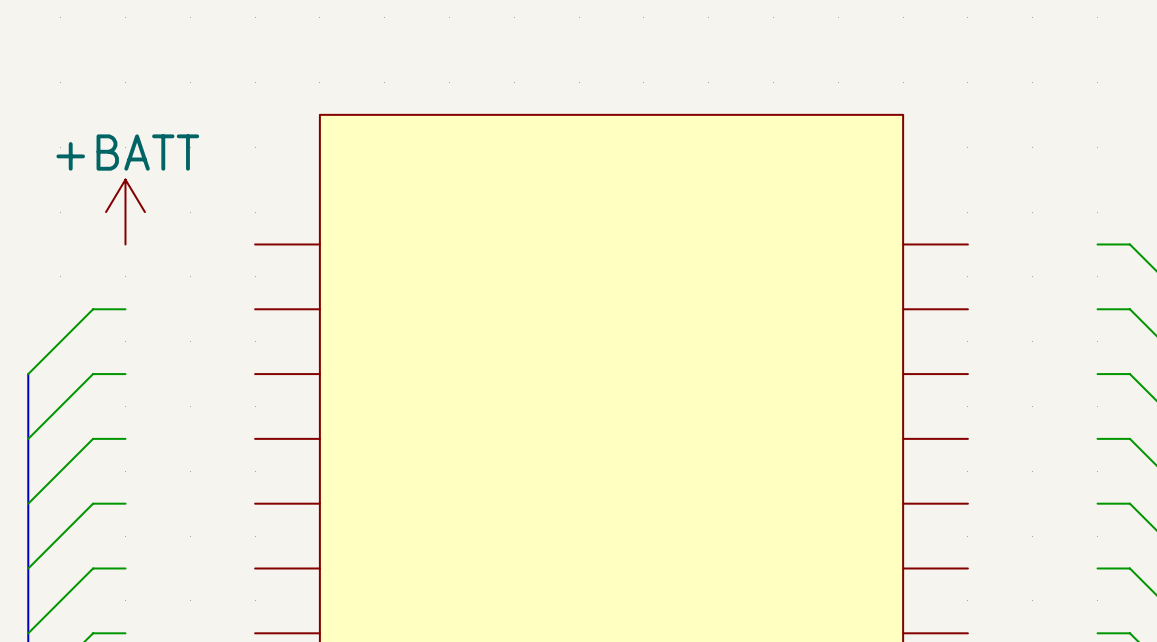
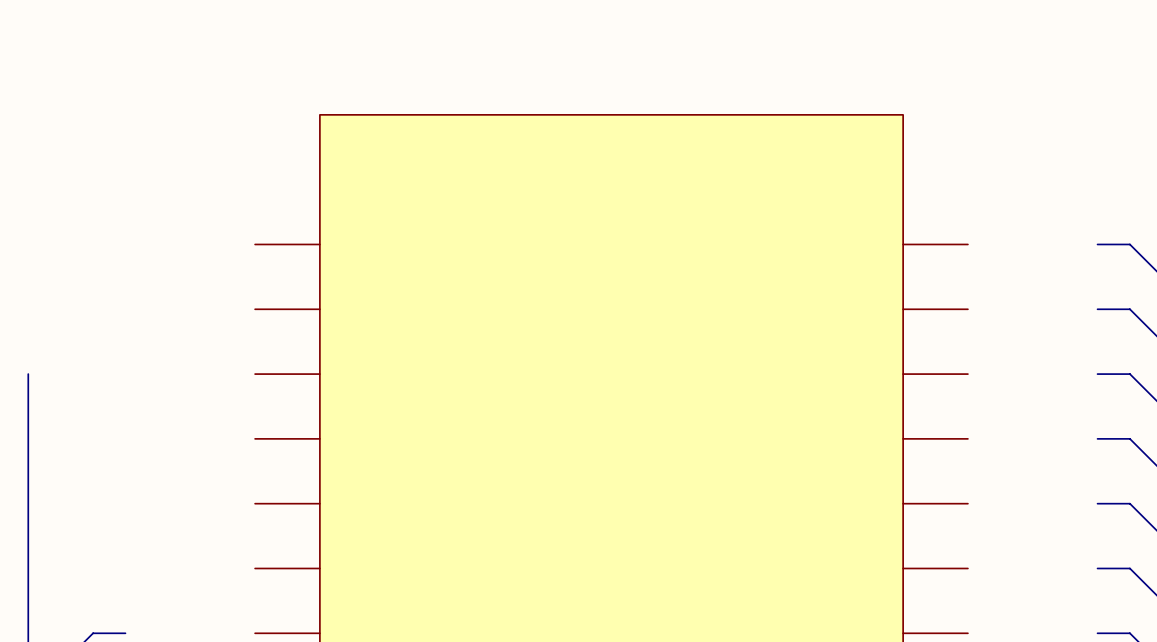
power symbol: +BATT (125, 212) -> none
wire: (125, 309) (93, 309) (28, 374) -> none
wire: (125, 374) (93, 374) (28, 438) -> none
wire: (125, 438) (93, 438) (28, 503) -> none
wire: (125, 503) (93, 503) (28, 568) -> none
wire: (125, 568) (93, 568) (28, 633) -> none

